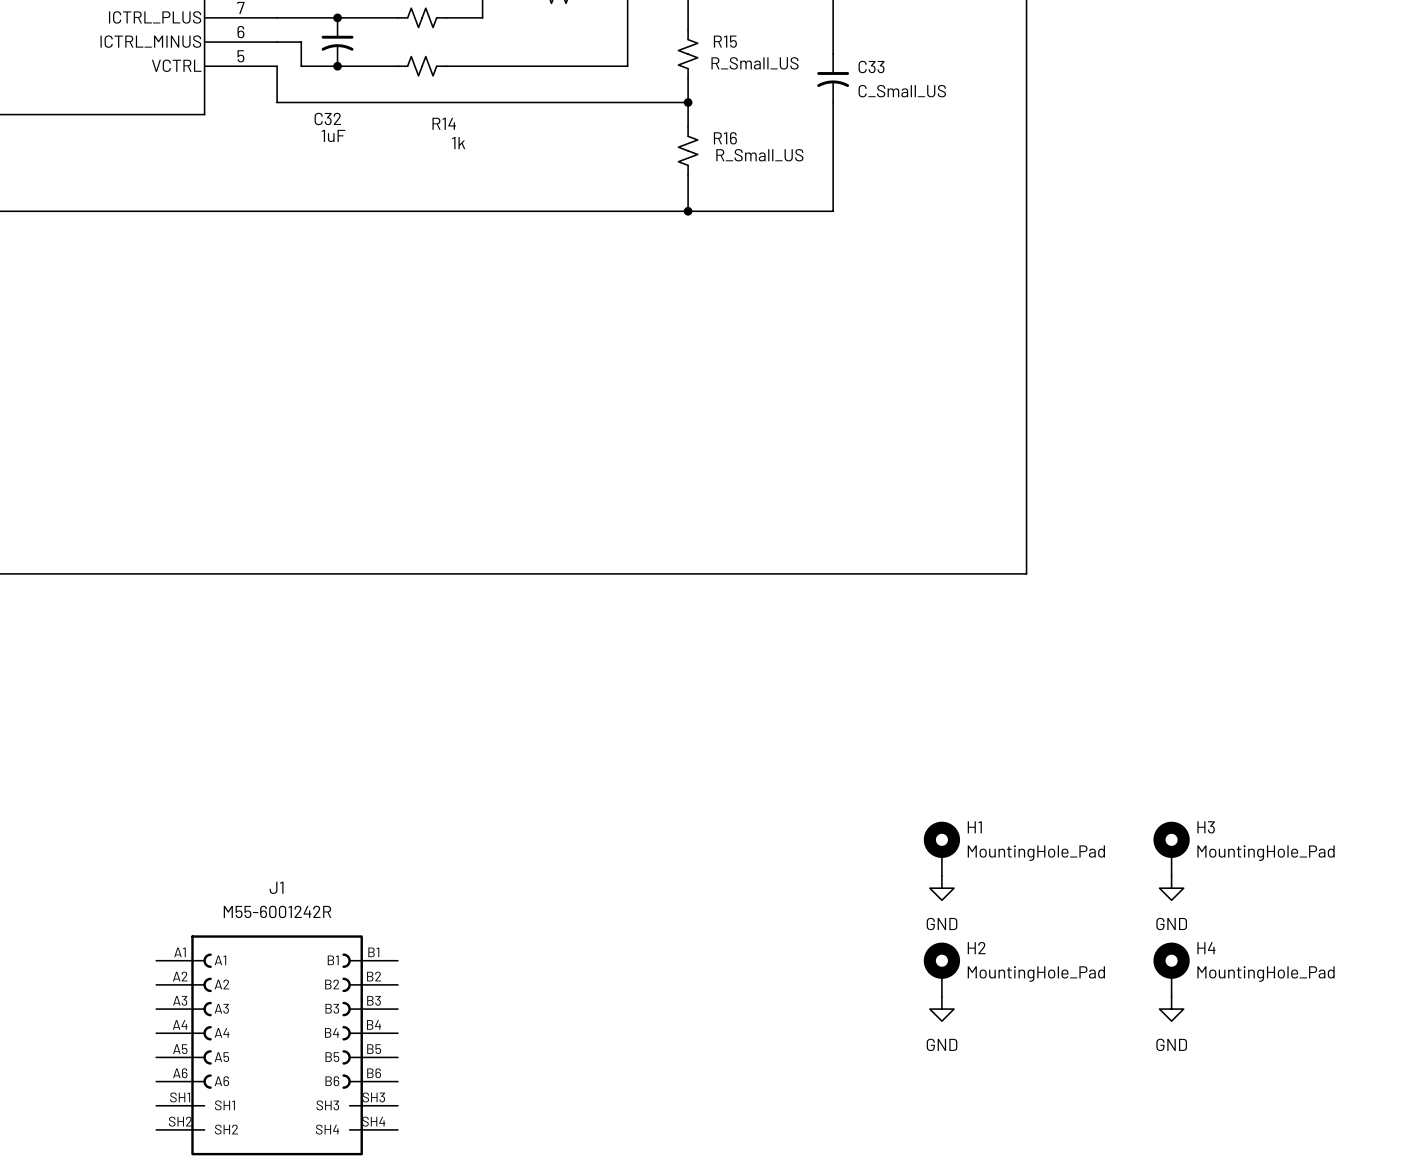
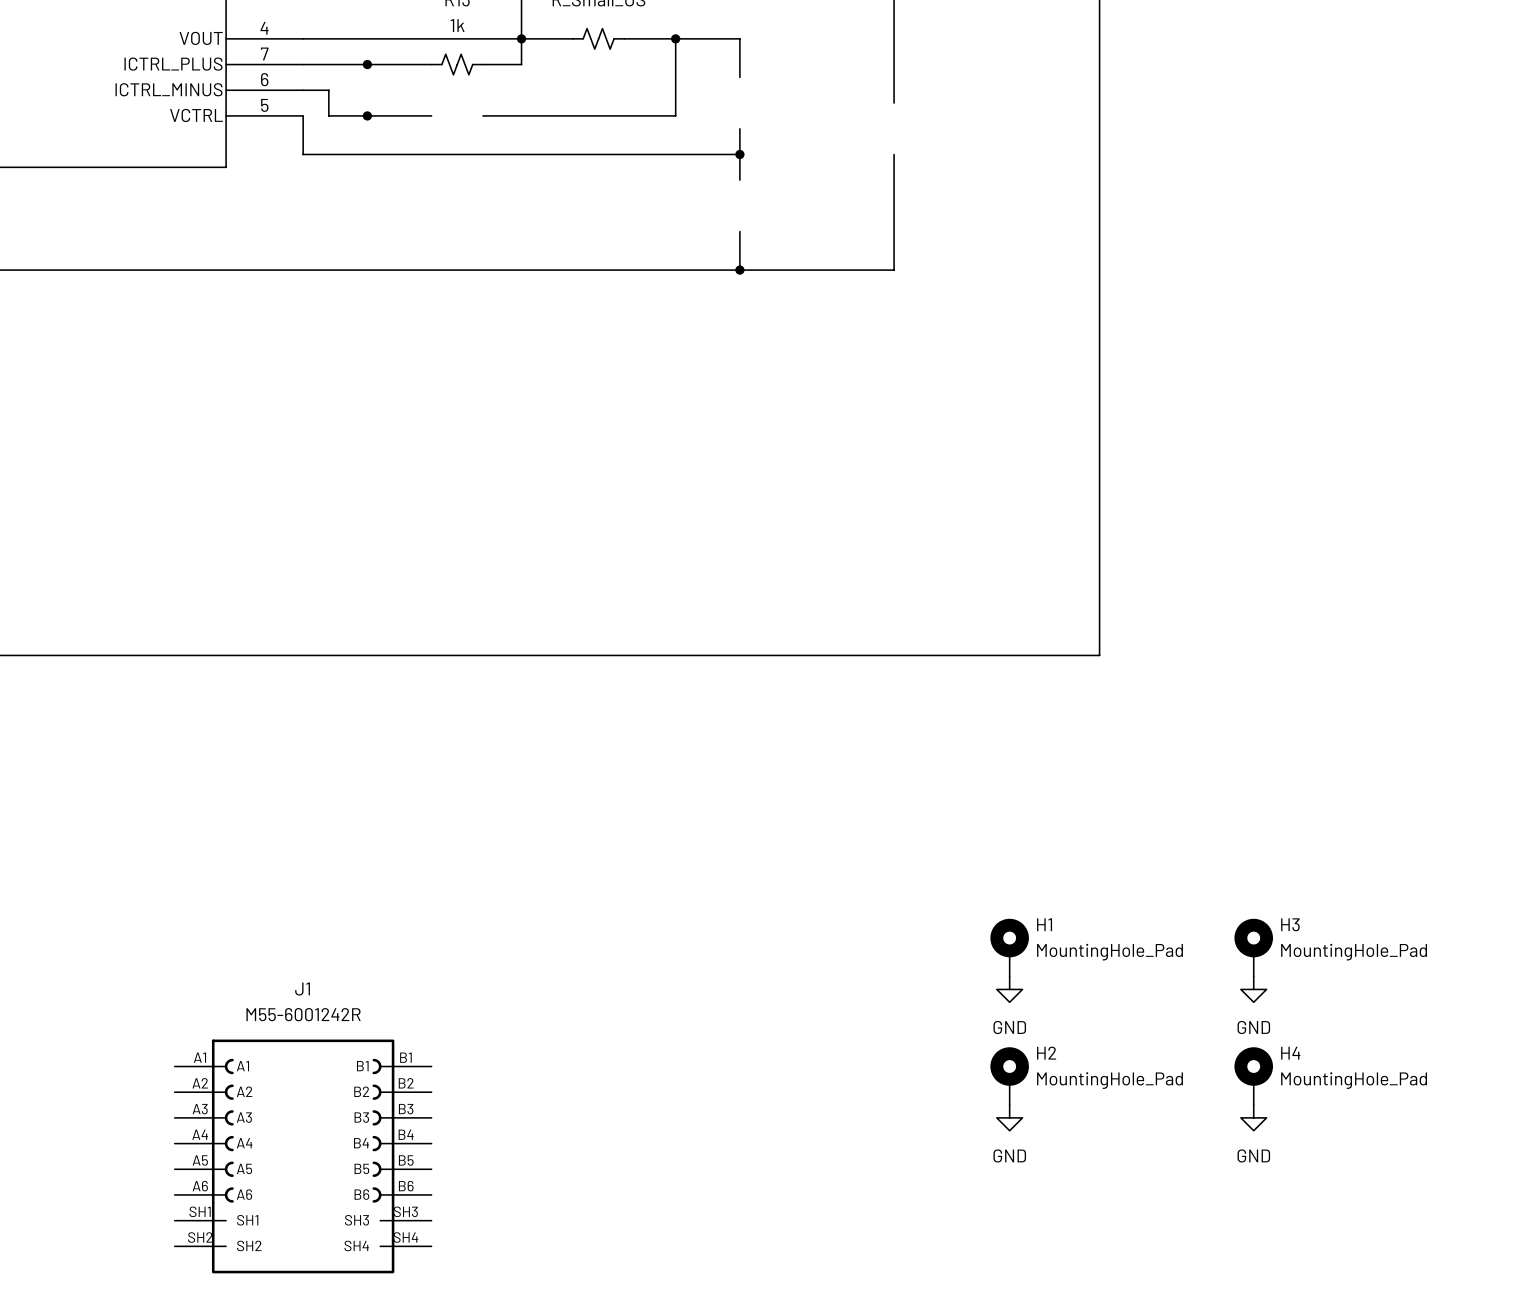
C32: 1uF (337, 42) -> none
R15: R_Small_US (688, 54) -> none
R14: 1k (422, 66) -> none
C33: C_Small_US (833, 78) -> none
R16: R_Small_US (688, 150) -> none

